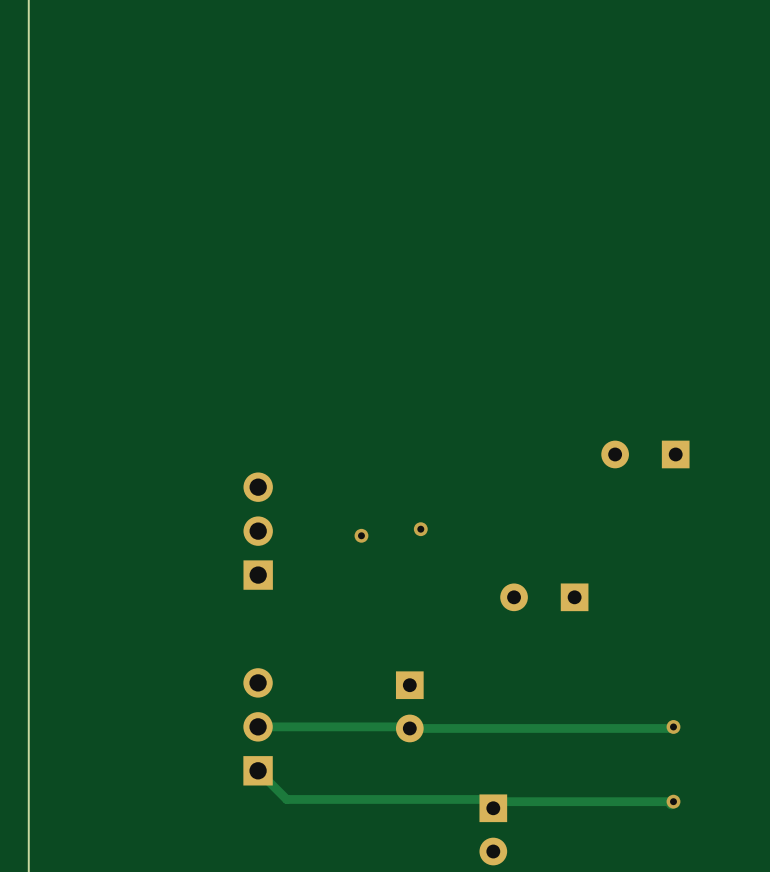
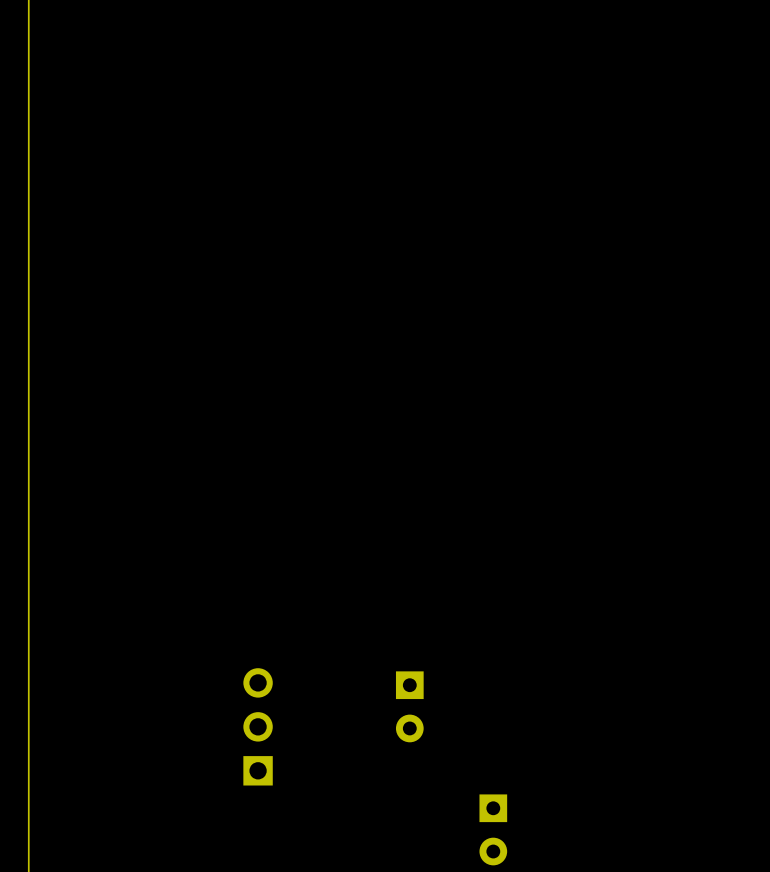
part: (645, 454) -> none
via: (420, 529) -> none
part: (258, 531) -> none
via: (361, 535) -> none
part: (544, 597) -> none
track: (258, 726) (408, 726) (409, 728) (673, 726) (673, 729) -> none
via: (673, 726) -> none
track: (258, 770) (286, 799) (484, 799) (493, 808) (497, 803) -> none
track: (486, 801) (673, 801) (671, 803) -> none
via: (673, 801) -> none

